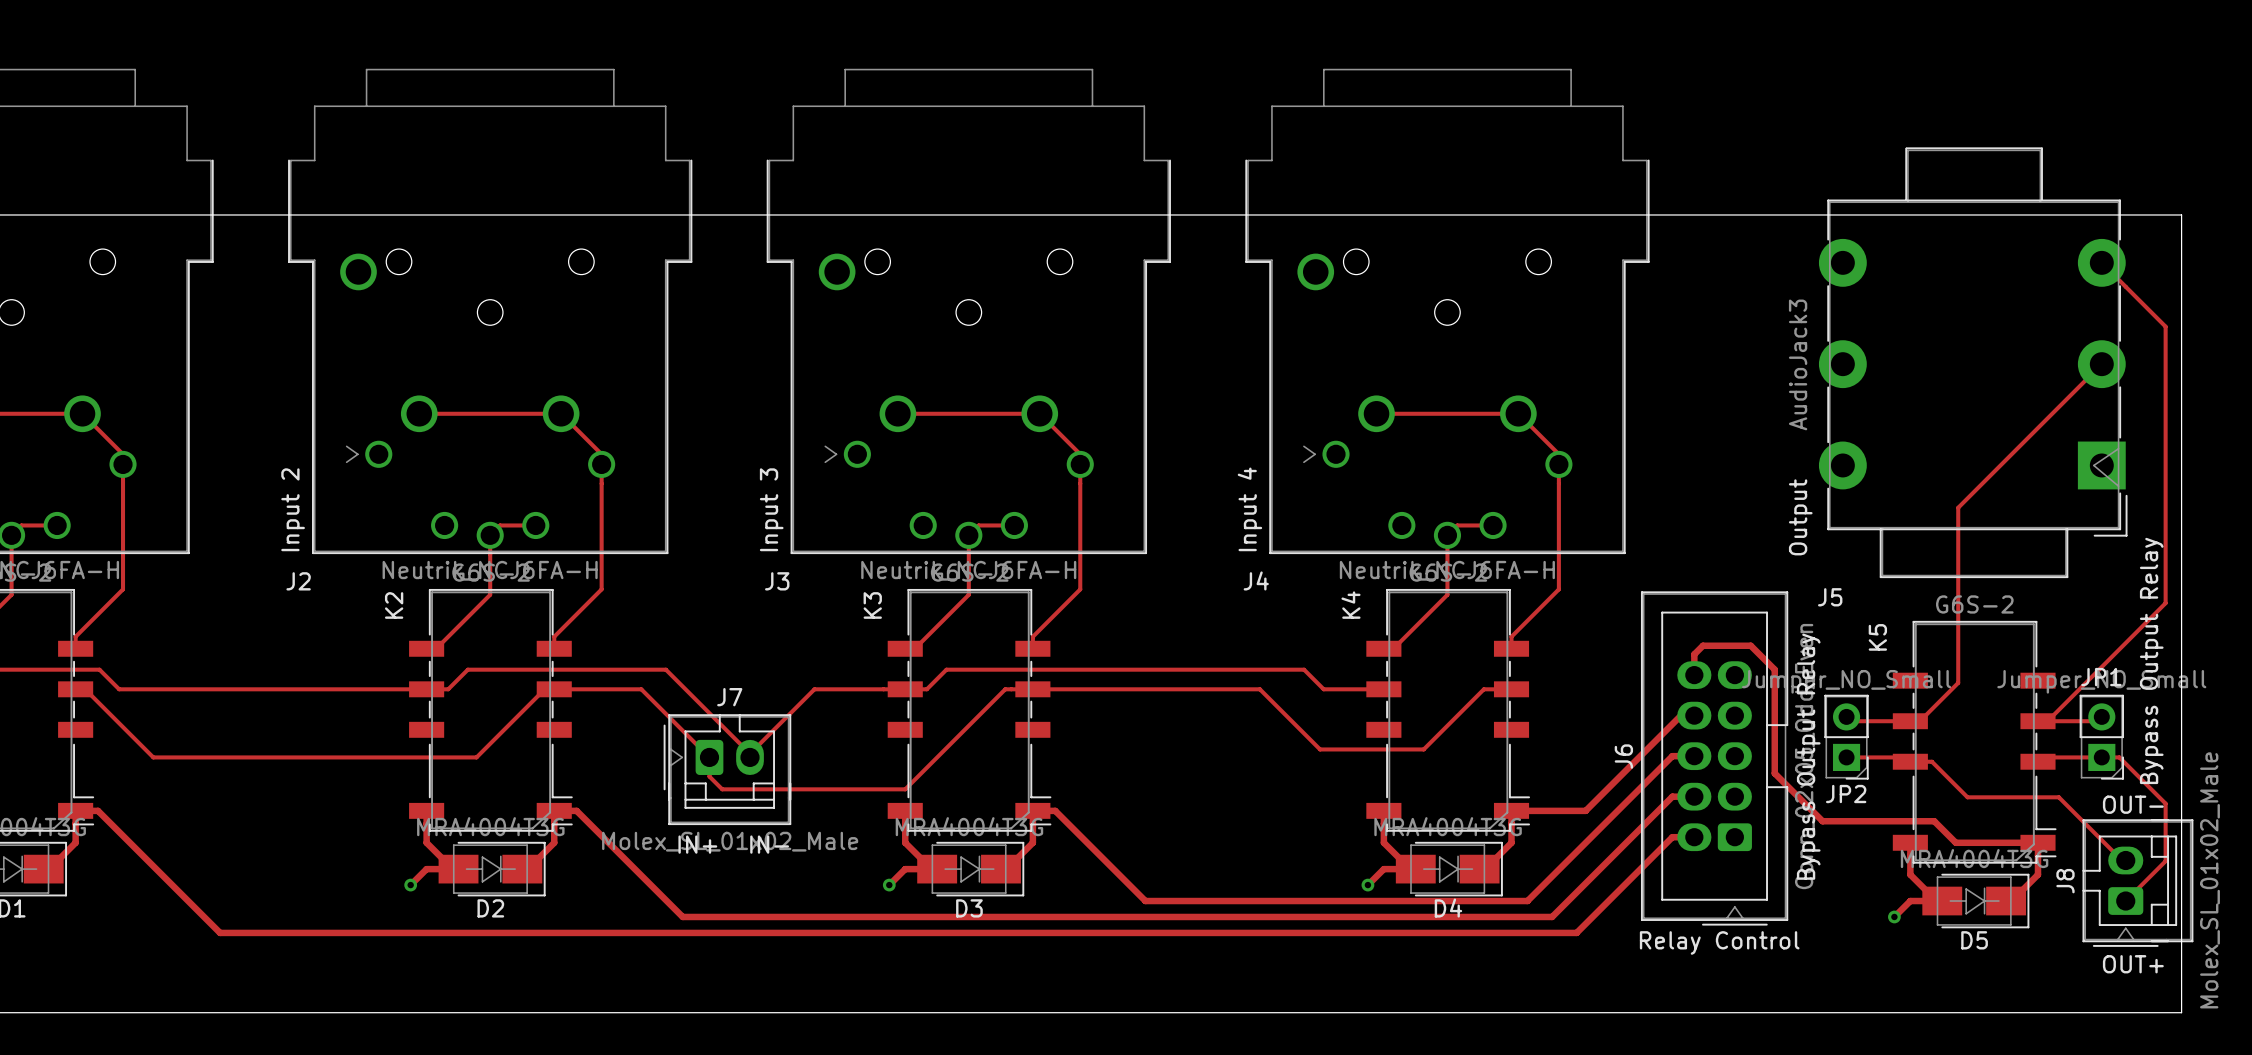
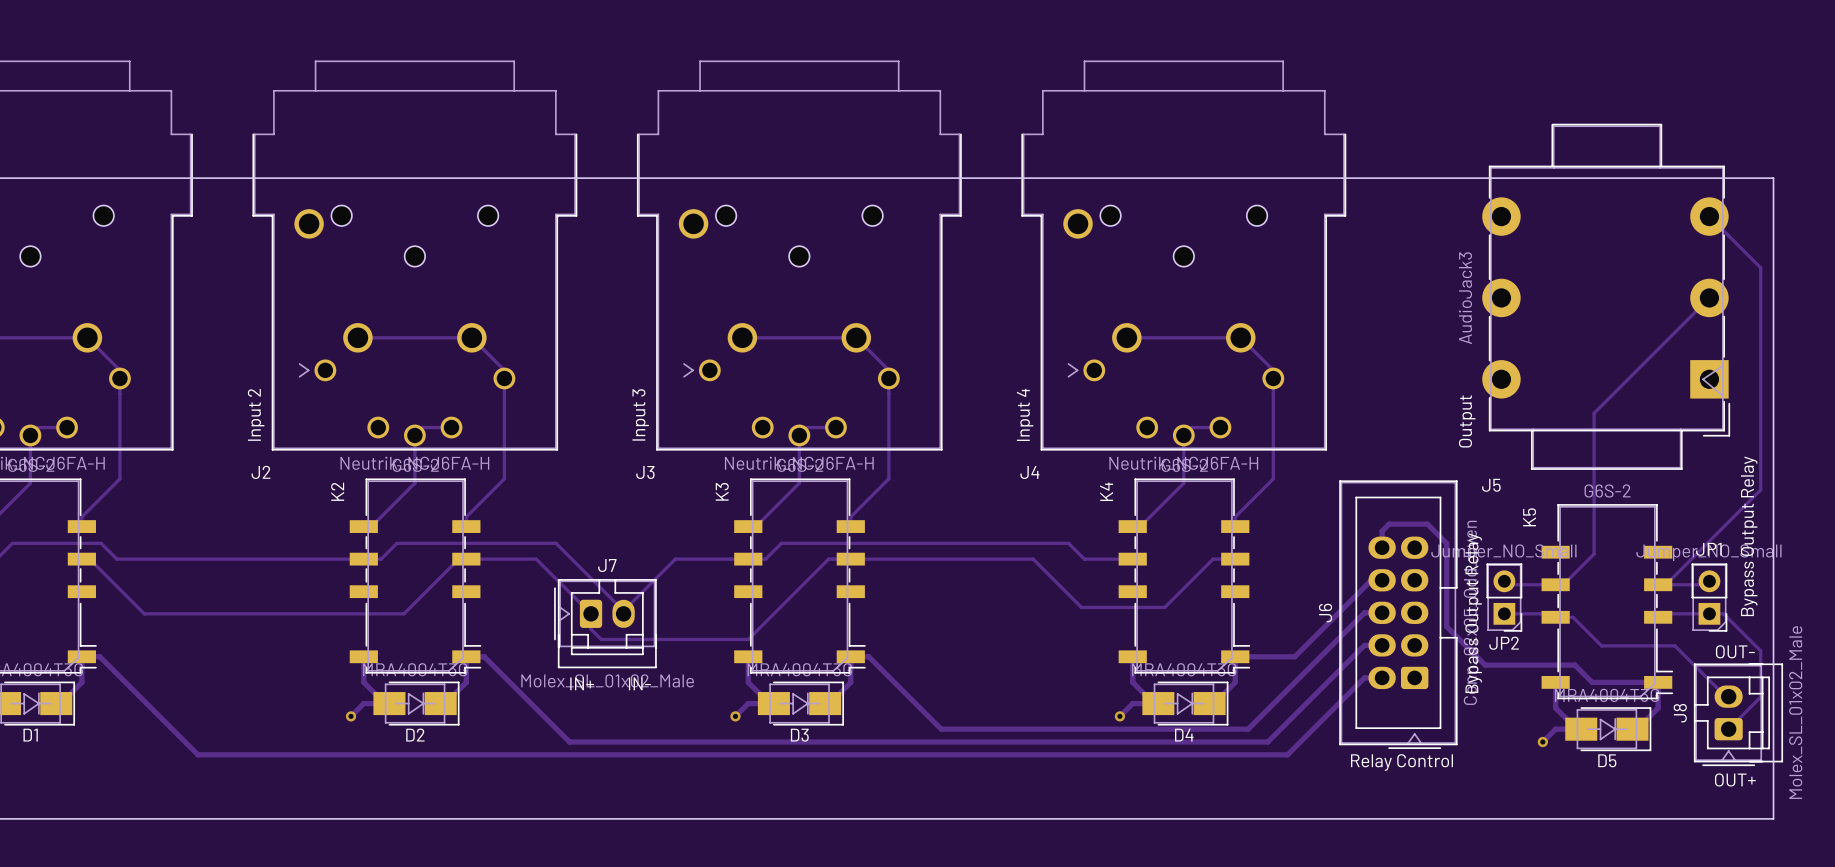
J7 footprint: [663, 714, 792, 826] -> [554, 579, 657, 669]
J8 footprint: [2082, 819, 2194, 947] -> [1693, 663, 1783, 767]

